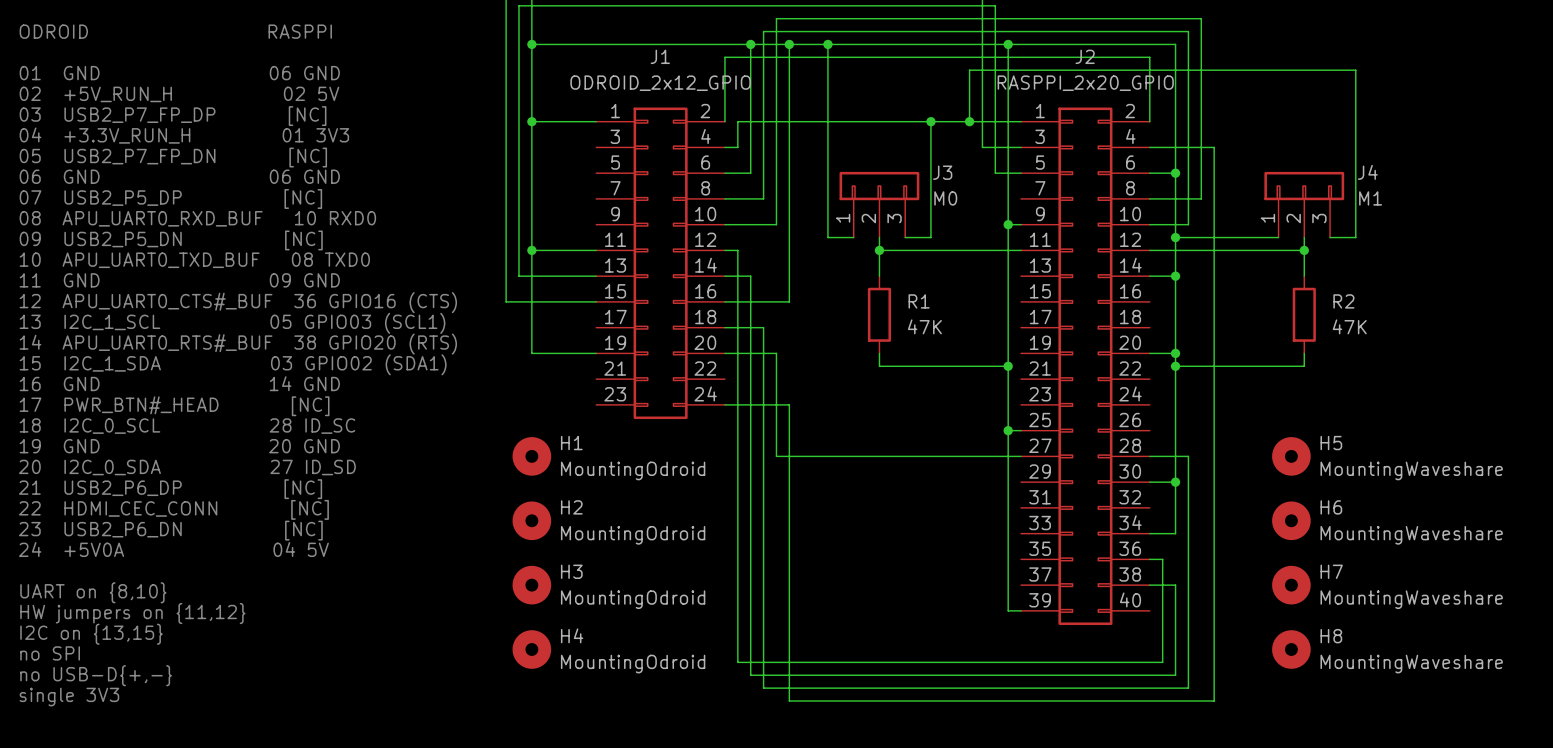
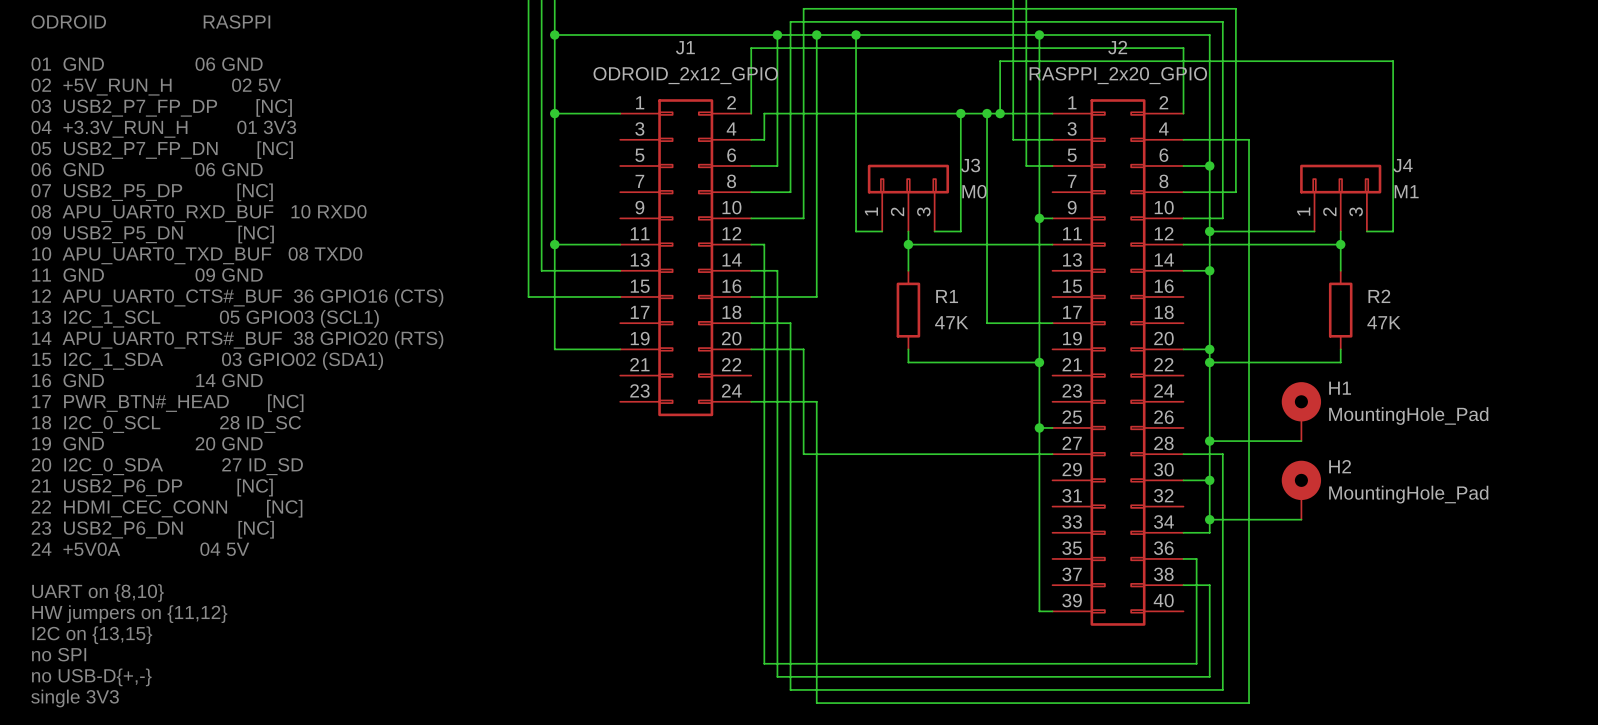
wire: none -> (987, 113) (987, 323) (1052, 323)
junction: none -> (987, 113)
H1 symbol: [512, 437, 552, 476] -> [1281, 382, 1322, 442]
wire: none -> (1209, 441) (1301, 441)
junction: none -> (1209, 441)
H5: MountingWaveshare (1291, 456) -> none
H1 value: MountingOdroid (633, 470) -> MountingHole_Pad (1408, 416)
H2 symbol: [512, 501, 552, 541] -> [1281, 460, 1322, 520]
wire: none -> (1209, 519) (1301, 519)
junction: none -> (1209, 519)
H6: MountingWaveshare (1291, 520) -> none
H2 value: MountingOdroid (633, 535) -> MountingHole_Pad (1408, 494)
H3: MountingOdroid (531, 585) -> none
H7: MountingWaveshare (1291, 585) -> none
H4: MountingOdroid (531, 649) -> none
H8: MountingWaveshare (1291, 649) -> none

